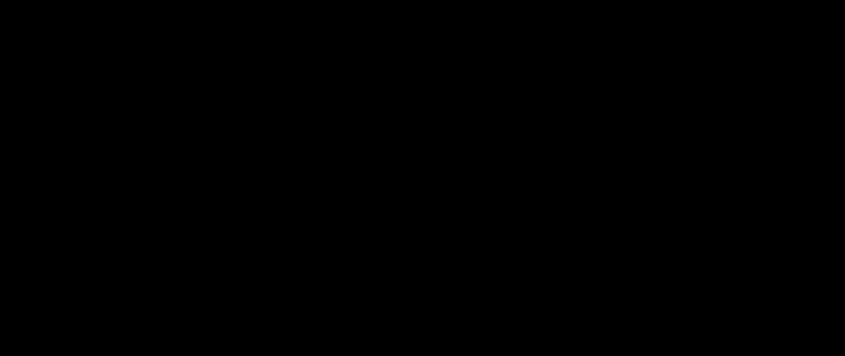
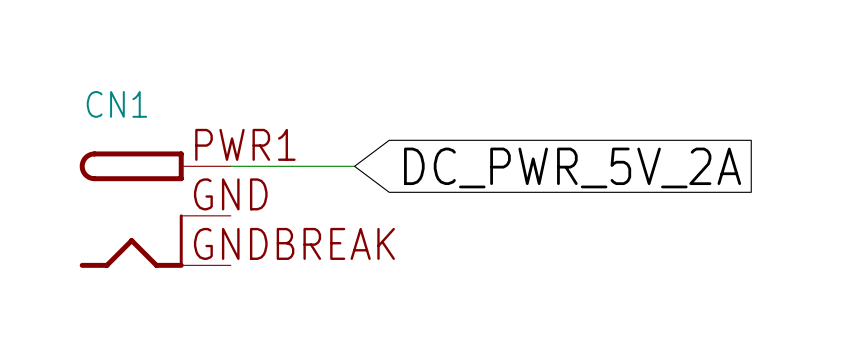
wire: none -> (230, 166) (354, 166)
global label: none -> DC_PWR_5V_2A (572, 167)
CN1: none -> (155, 209)

